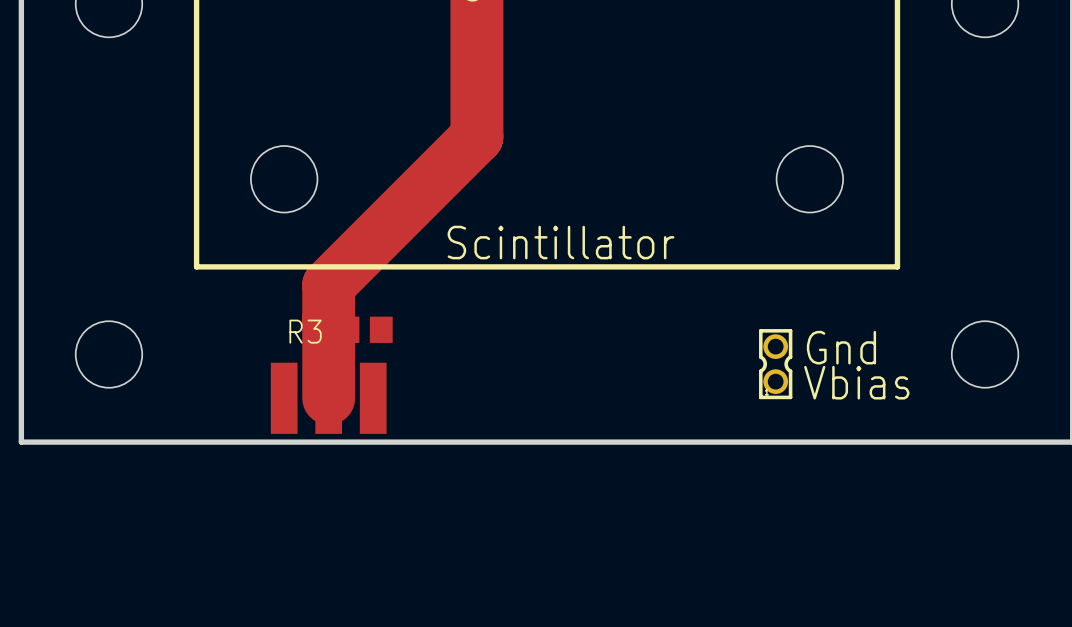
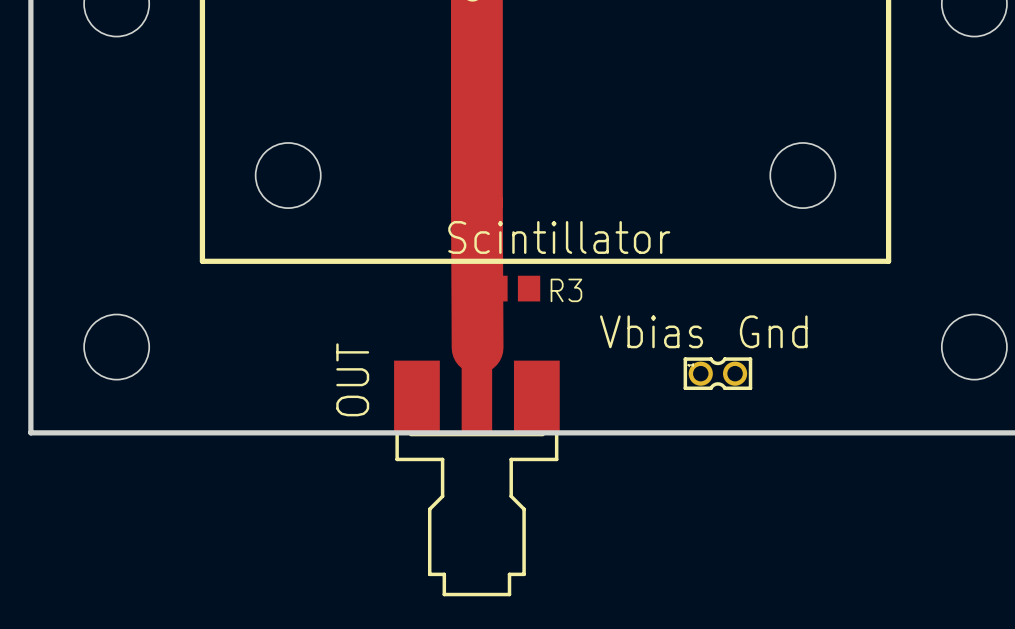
track: (476, 136) (328, 285) (328, 398) -> (476, 134) (477, 347)
R3 position: (364, 329) -> (512, 288)
R3 name position: R3 (305, 331) -> R3 (566, 290)
text position: Gnd (841, 347) -> Gnd (773, 331)
part: (775, 364) -> none
part: none -> (717, 373)
text position: Vbias (856, 382) -> Vbias (651, 331)
part: (328, 398) -> none
OUT: none -> (476, 478)

